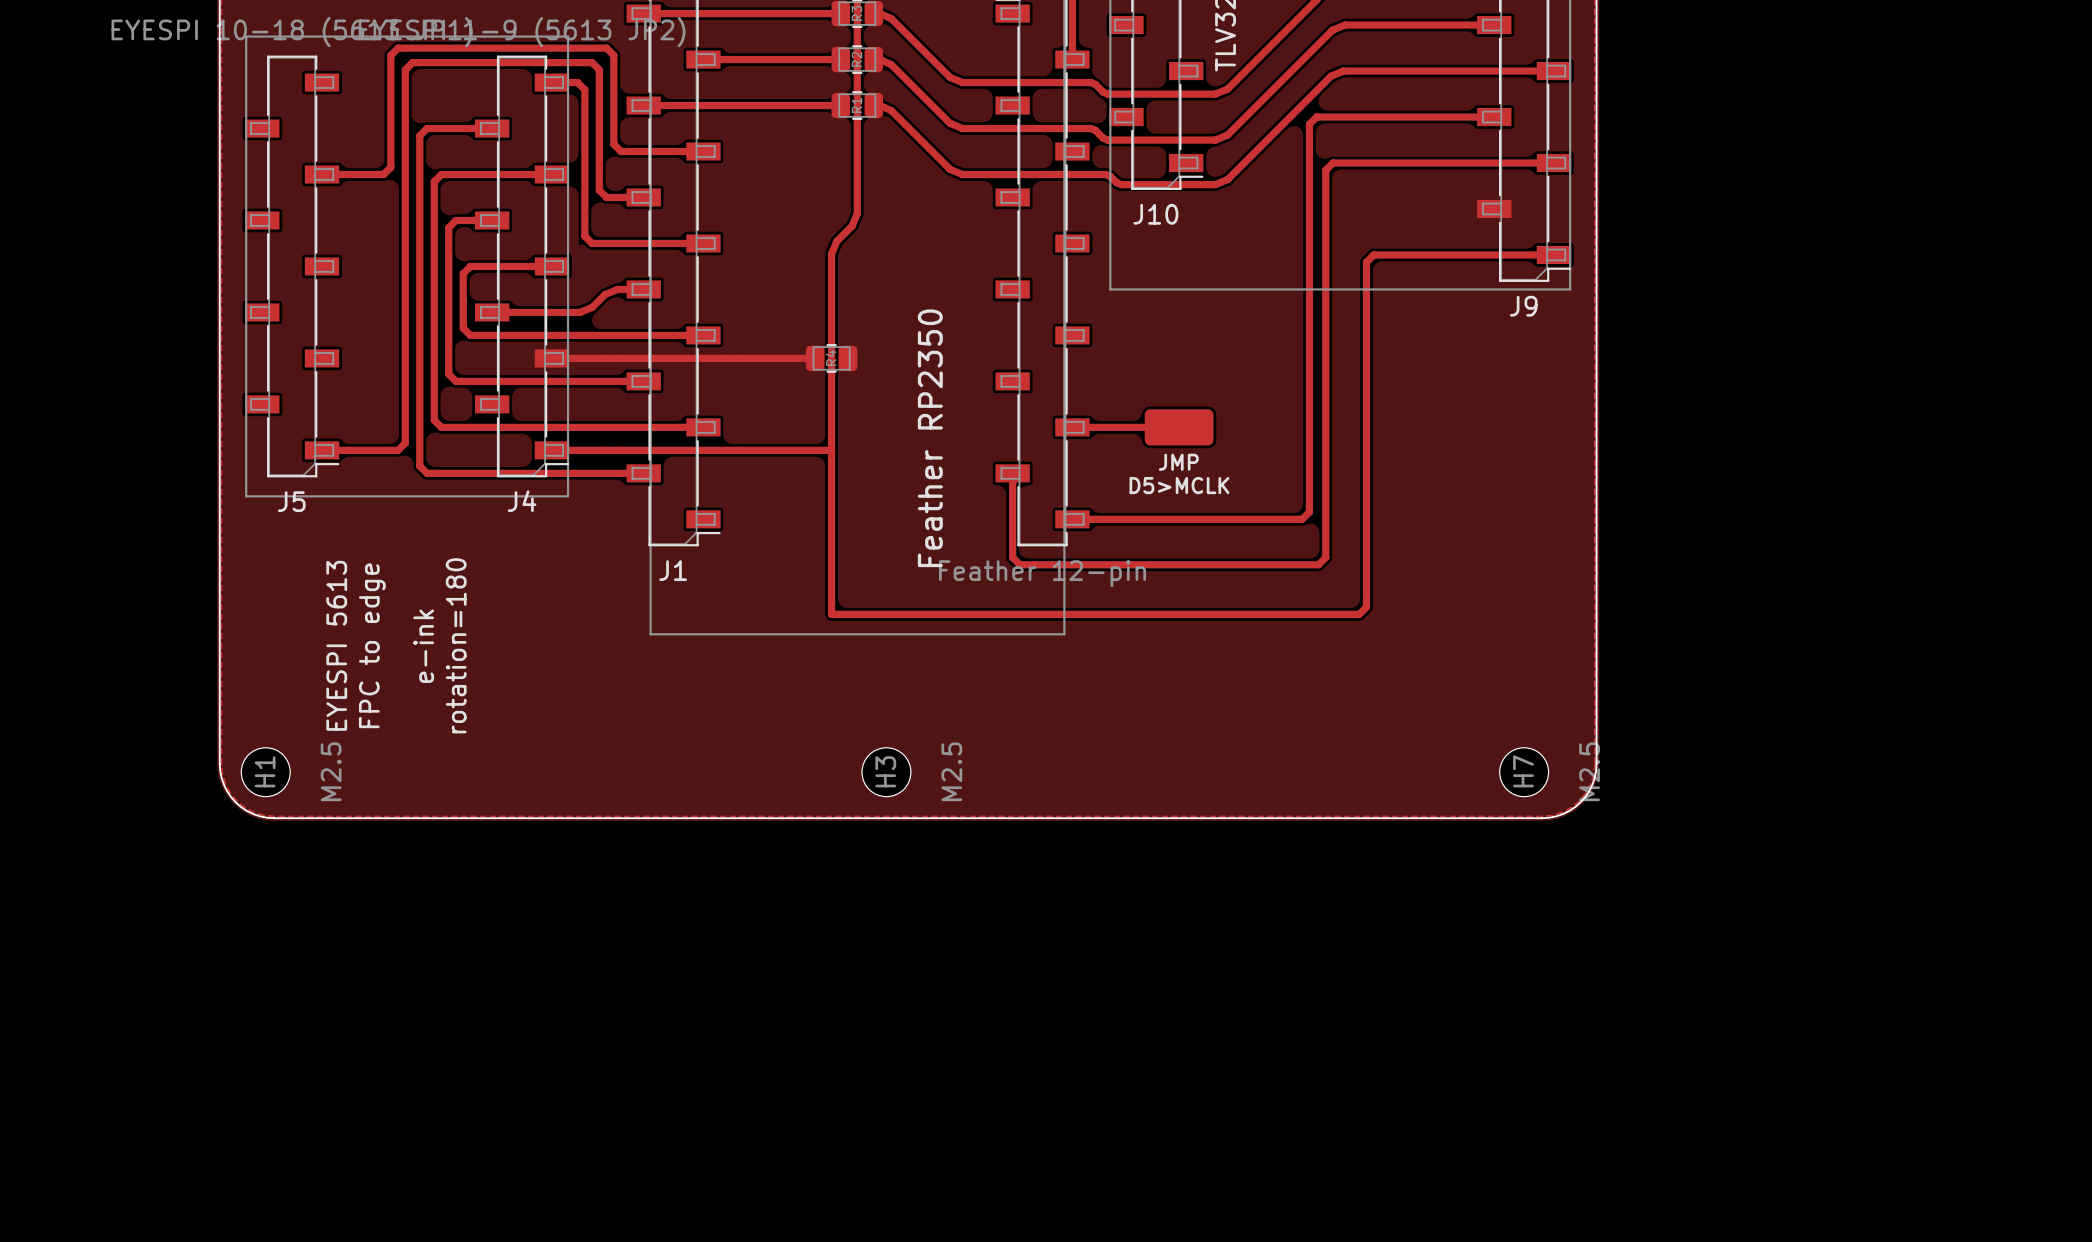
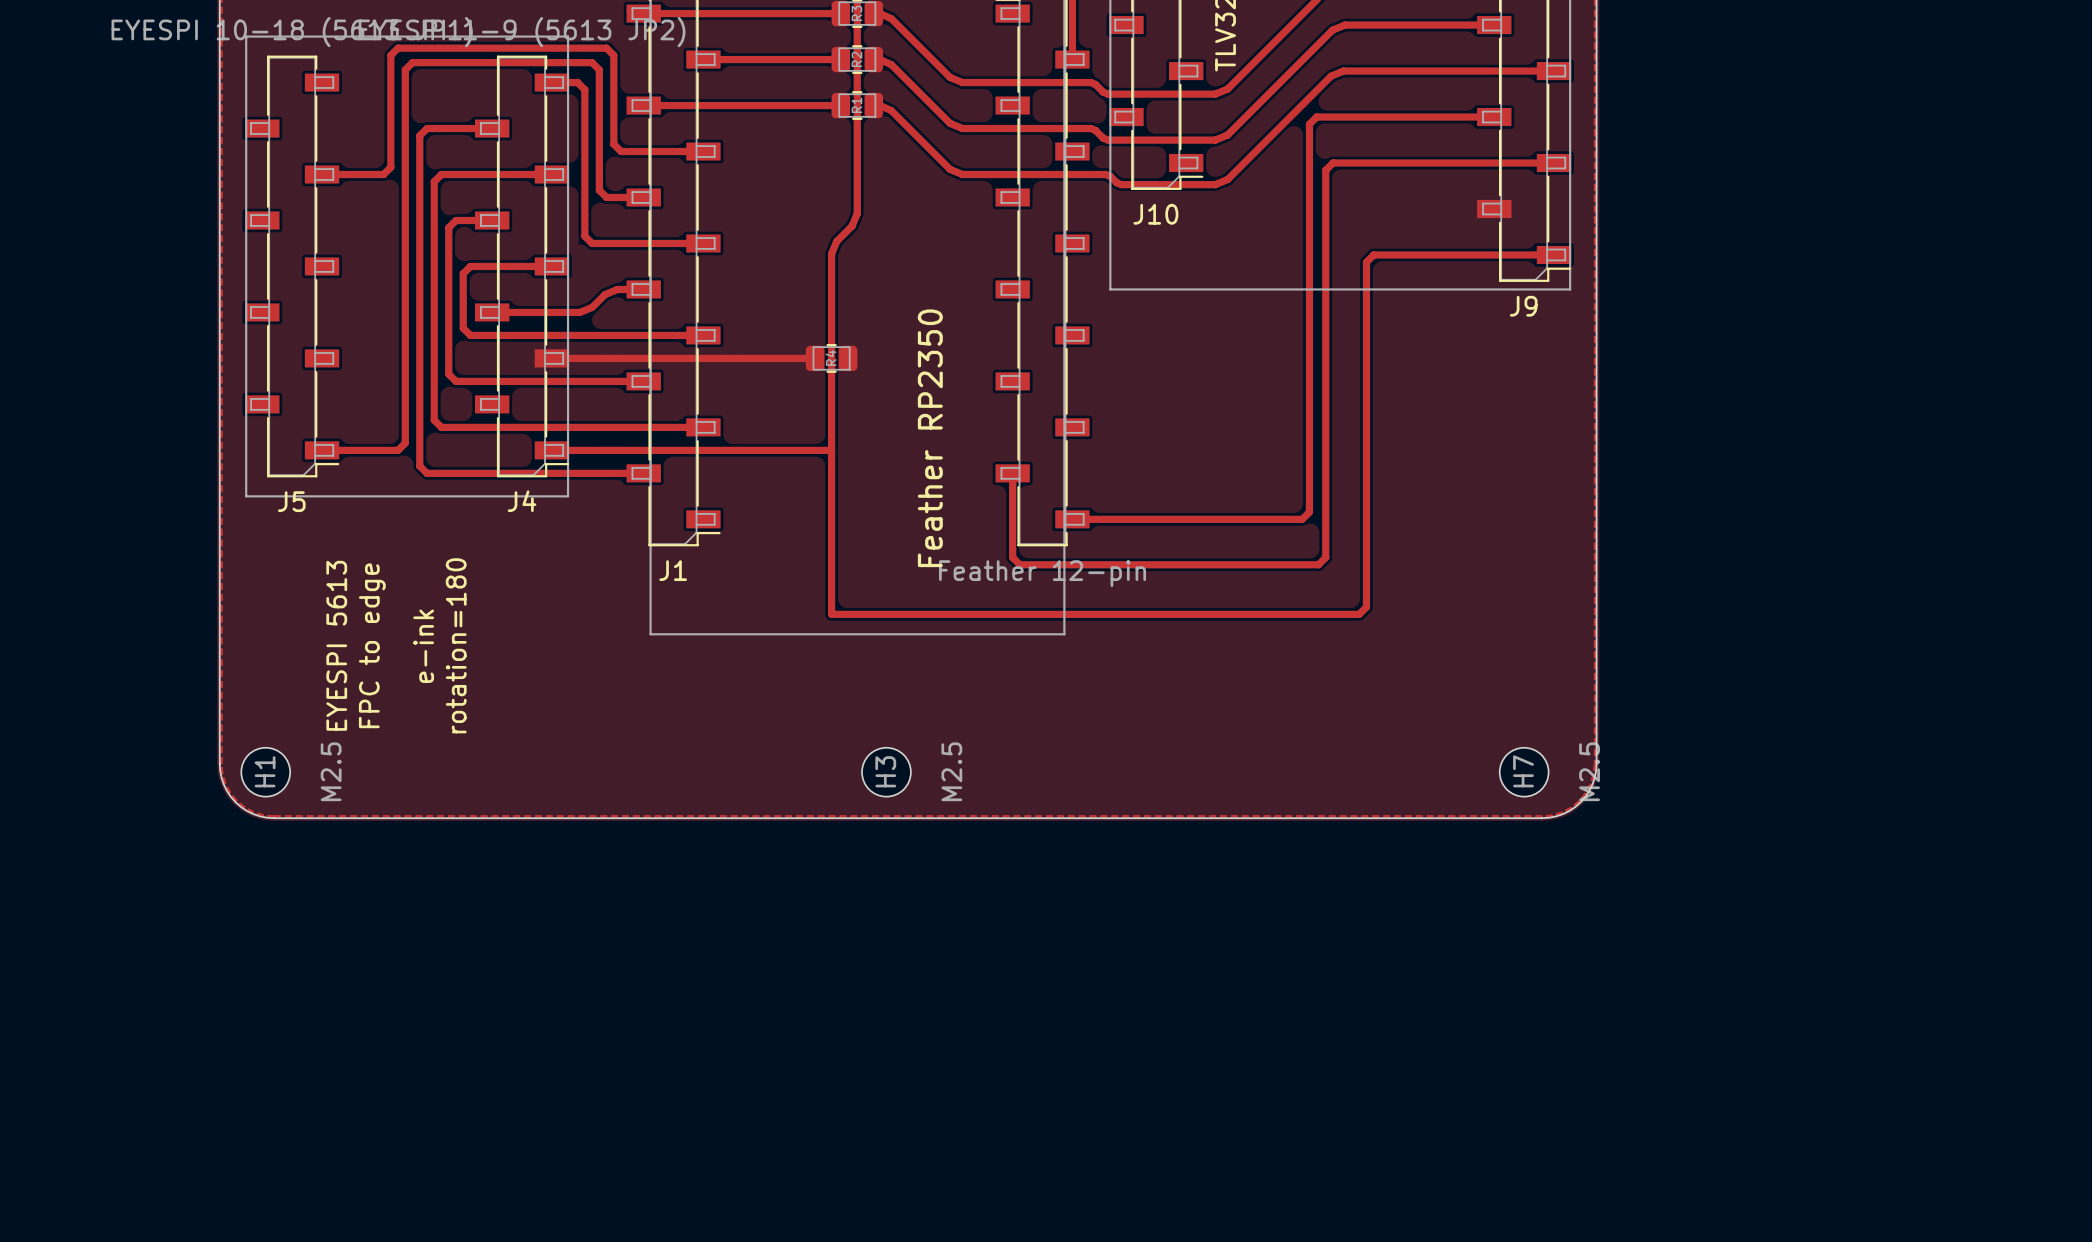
top track: (1072, 427) (1179, 427) -> none
part: (1179, 427) -> none
text: JMP (1178, 462) -> none
text: D5>MCLK (1179, 485) -> none

